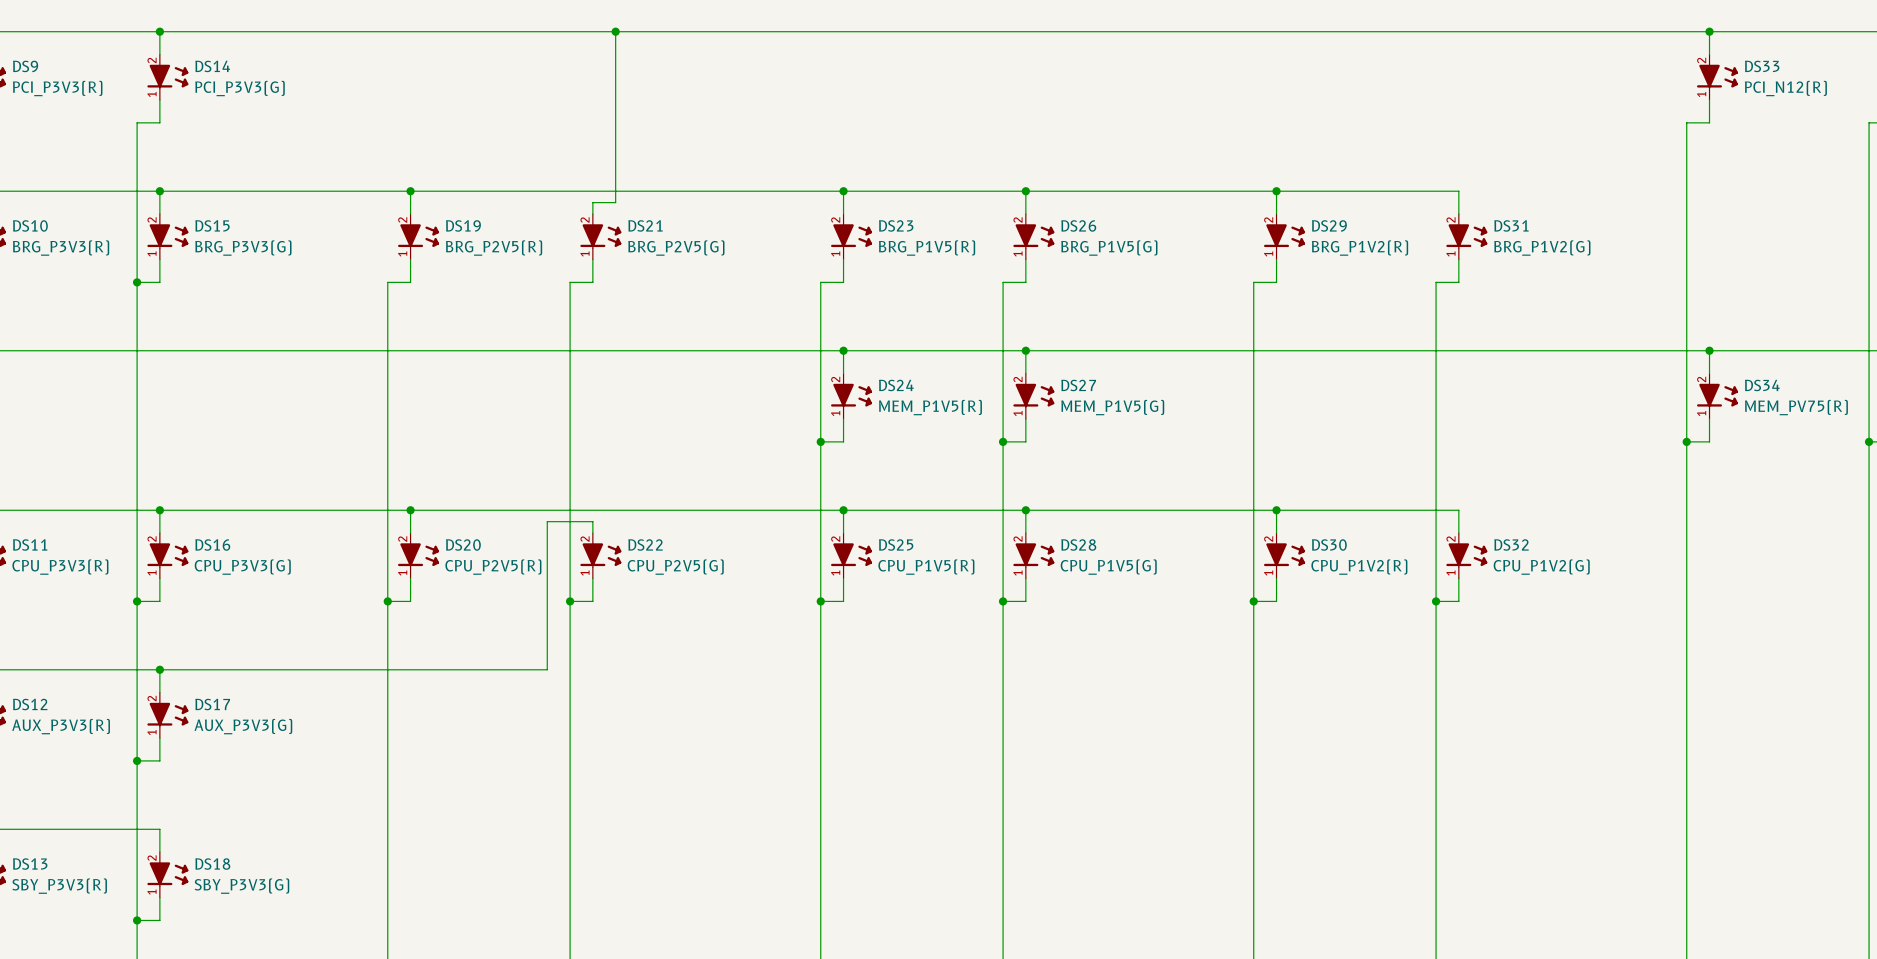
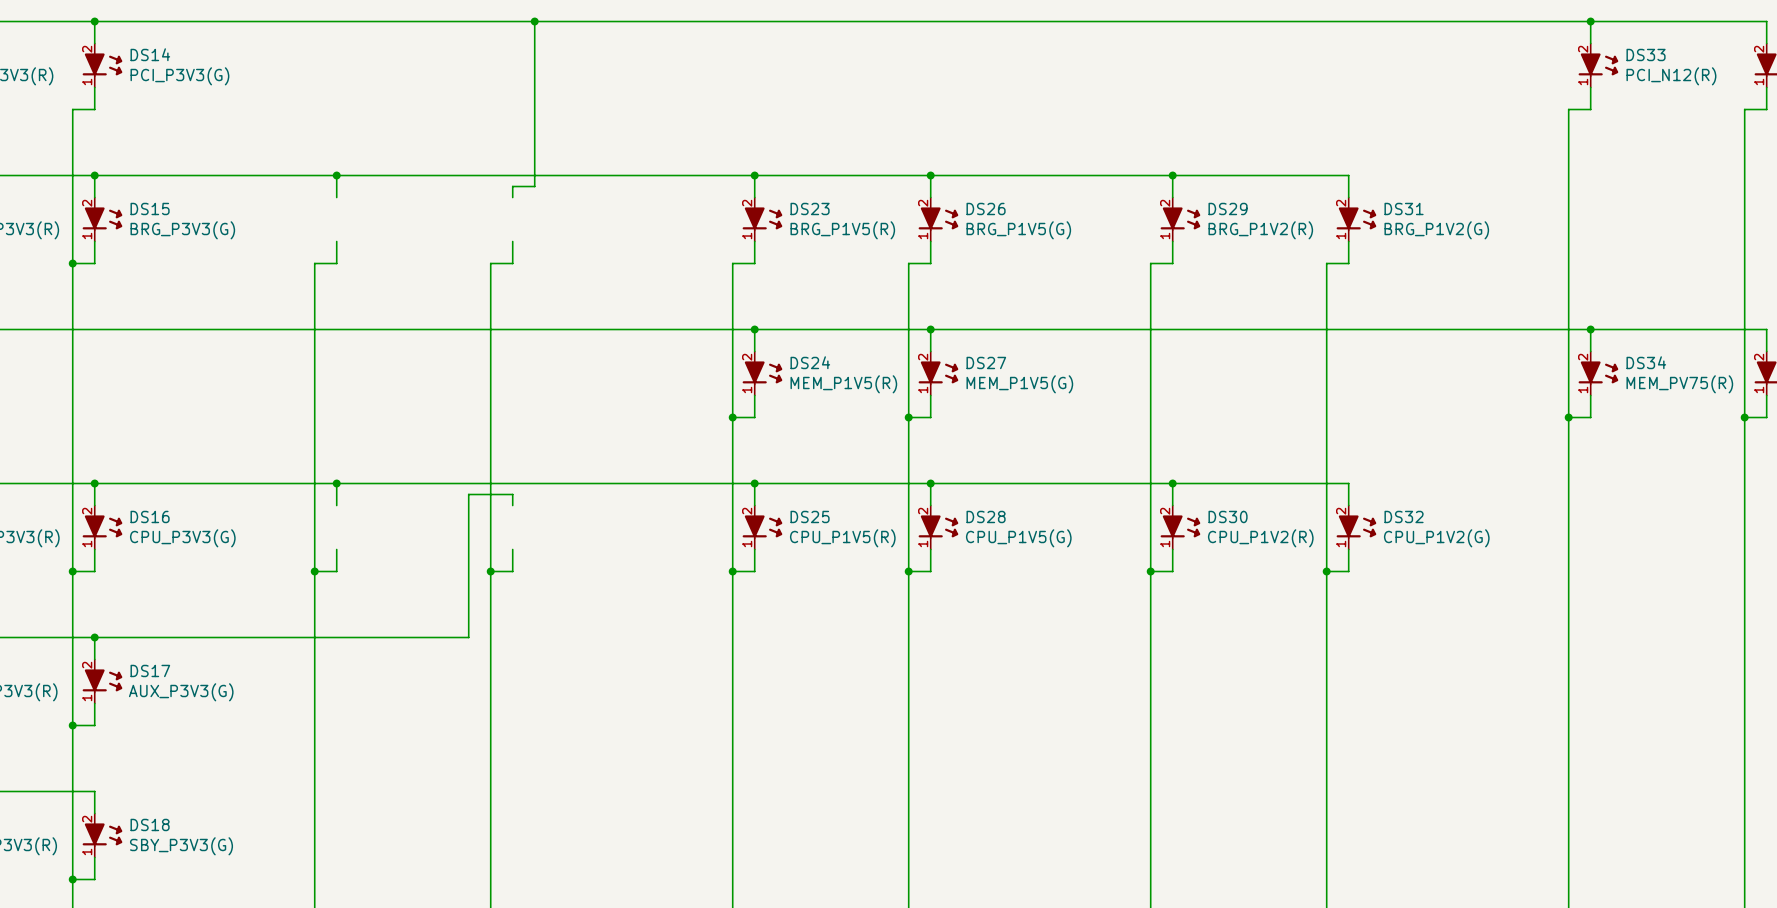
DS19: BRG_P2V5(R) (418, 236) -> none
DS21: BRG_P2V5(G) (600, 236) -> none
DS20: CPU_P2V5(R) (418, 555) -> none
DS22: CPU_P2V5(G) (600, 555) -> none

